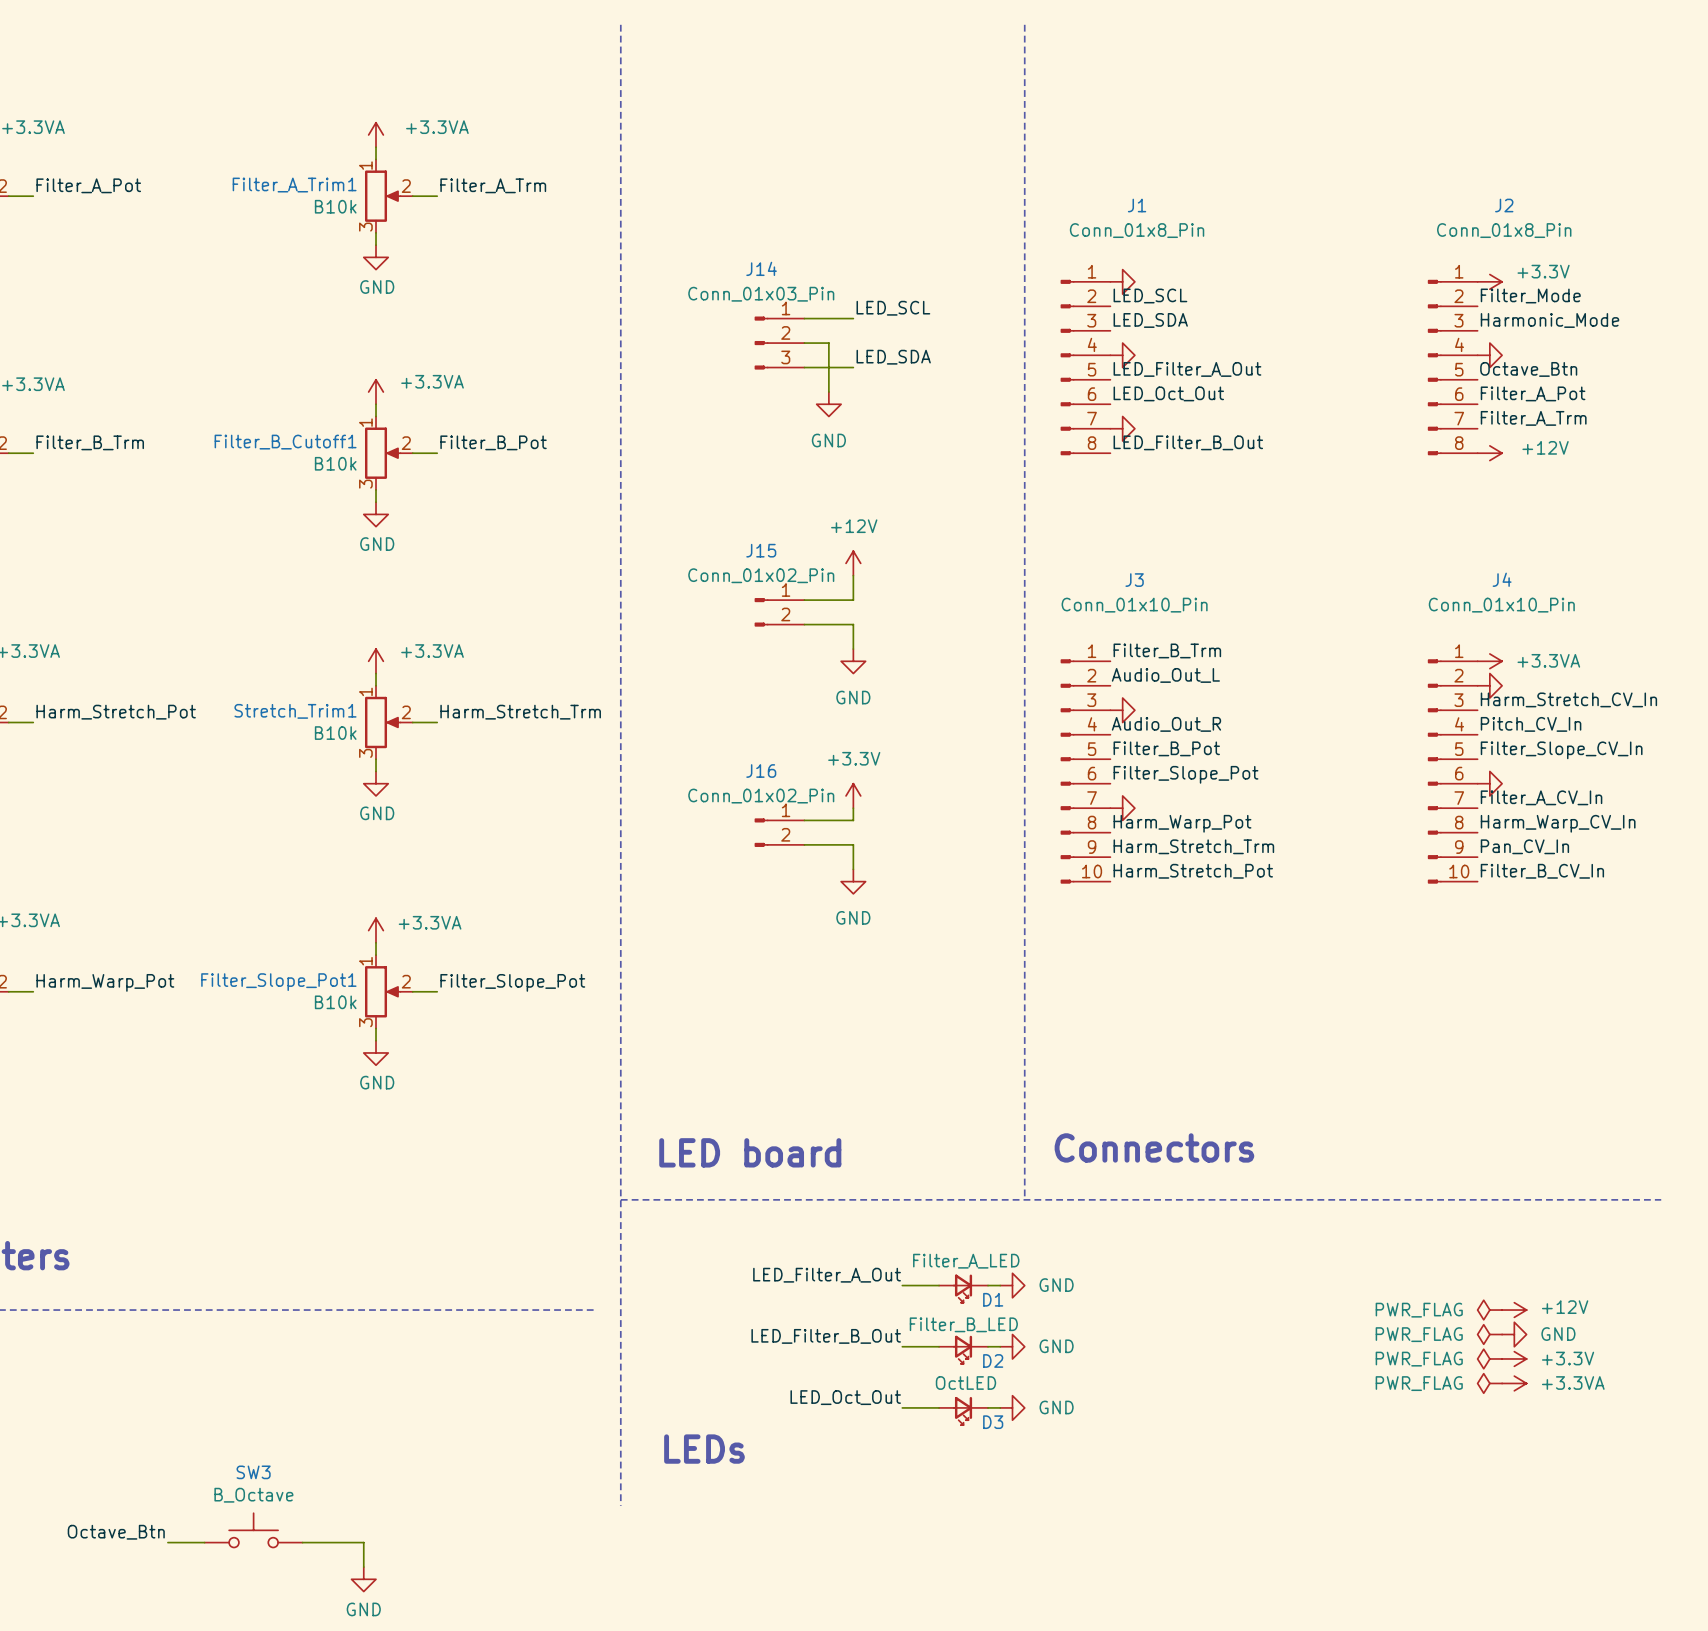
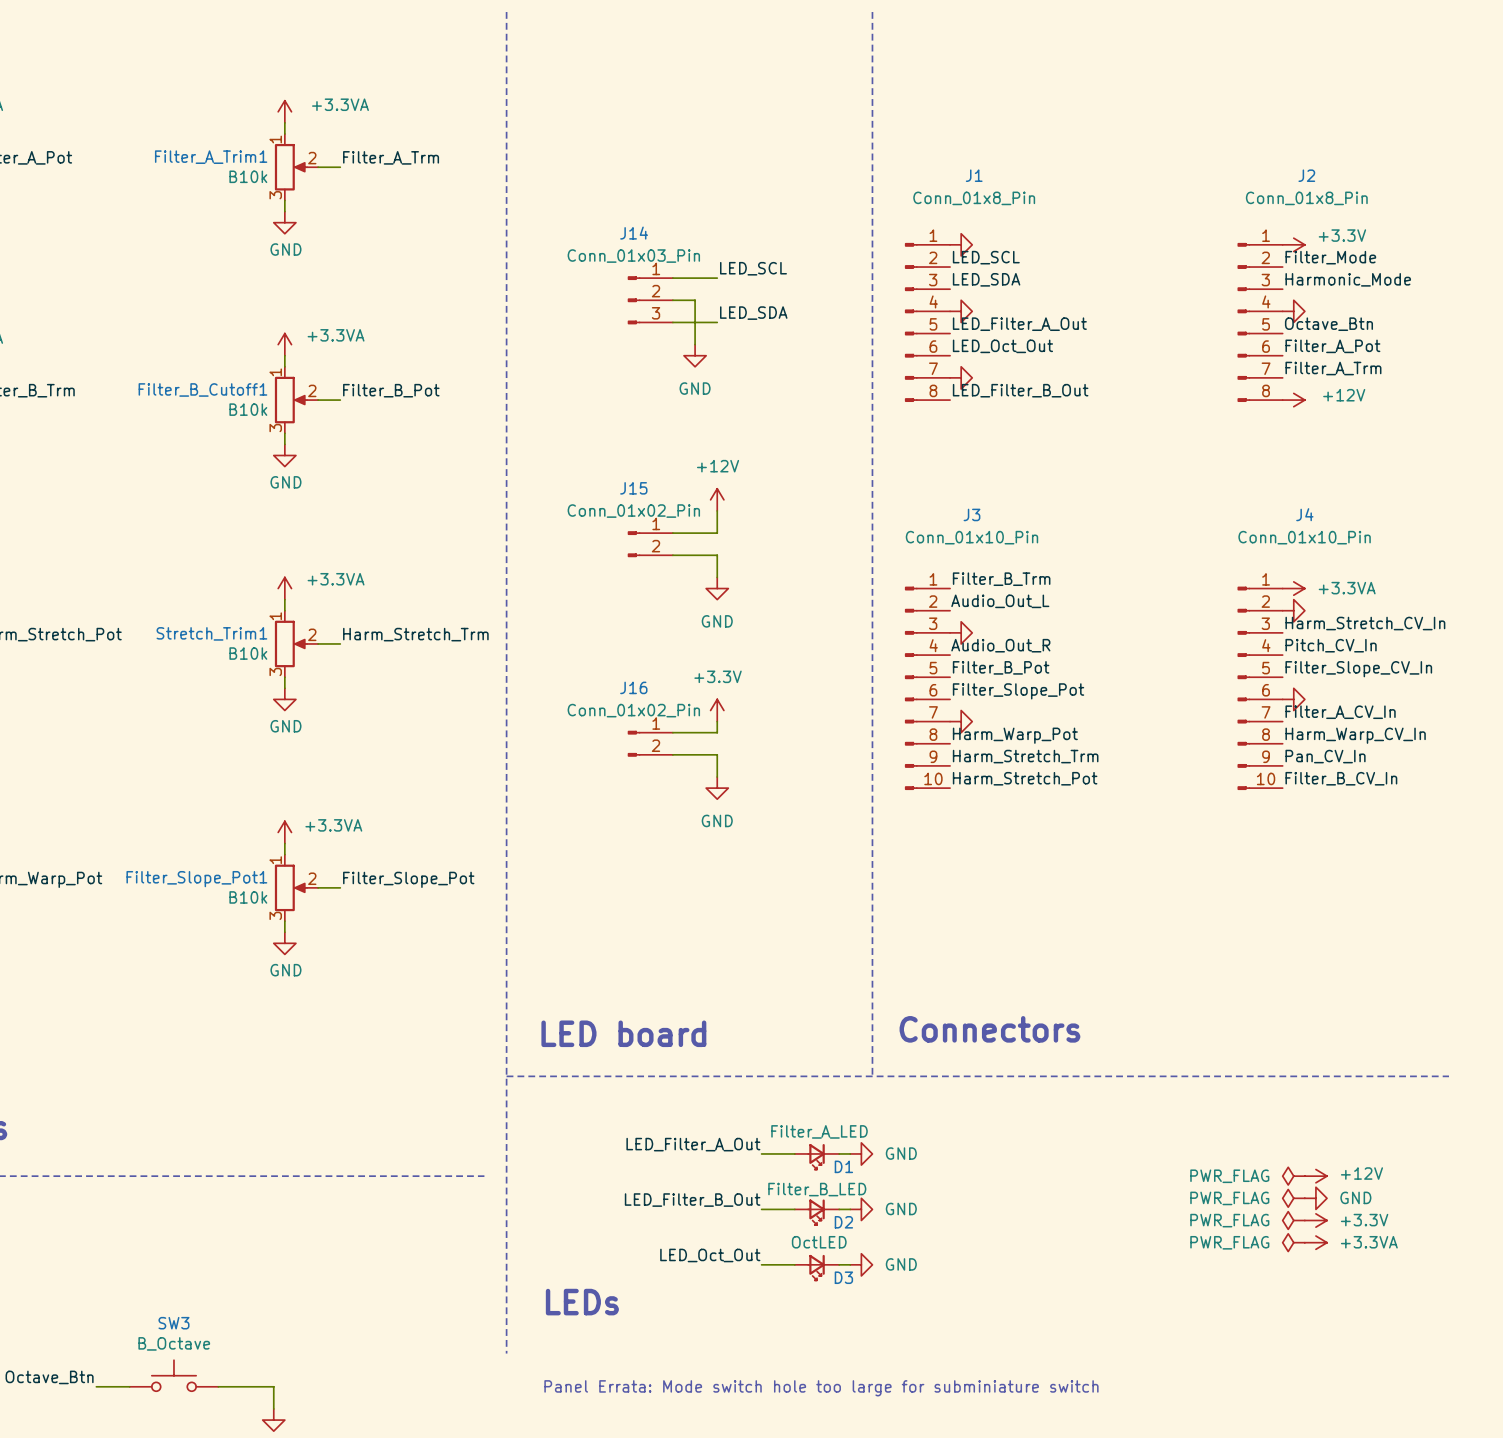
text: none -> Panel Errata: Mode switch hole too large for subminiature switch (821, 1388)

